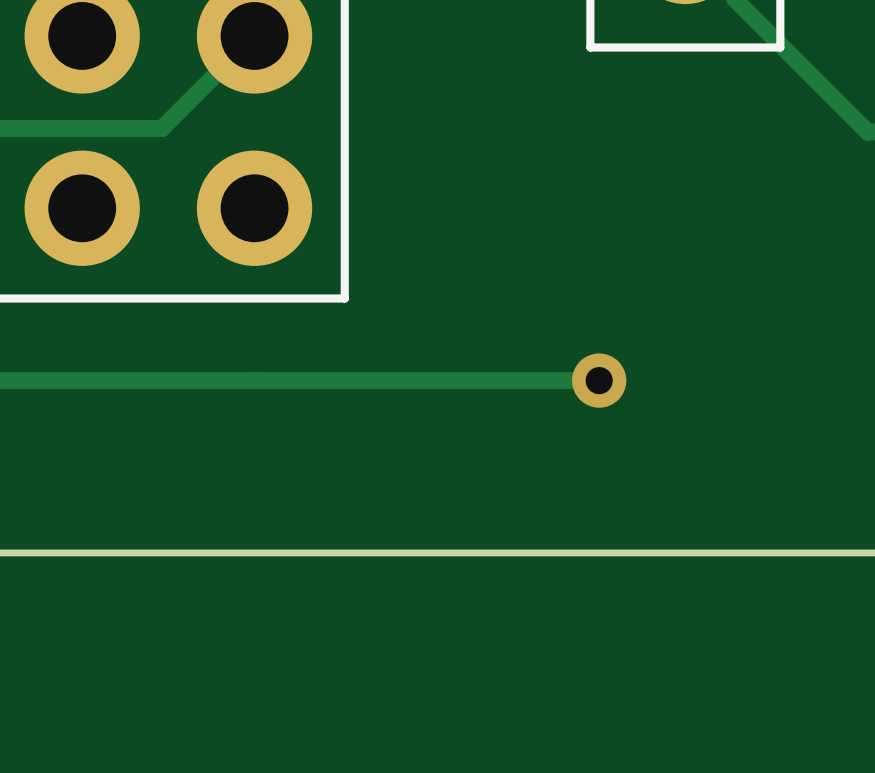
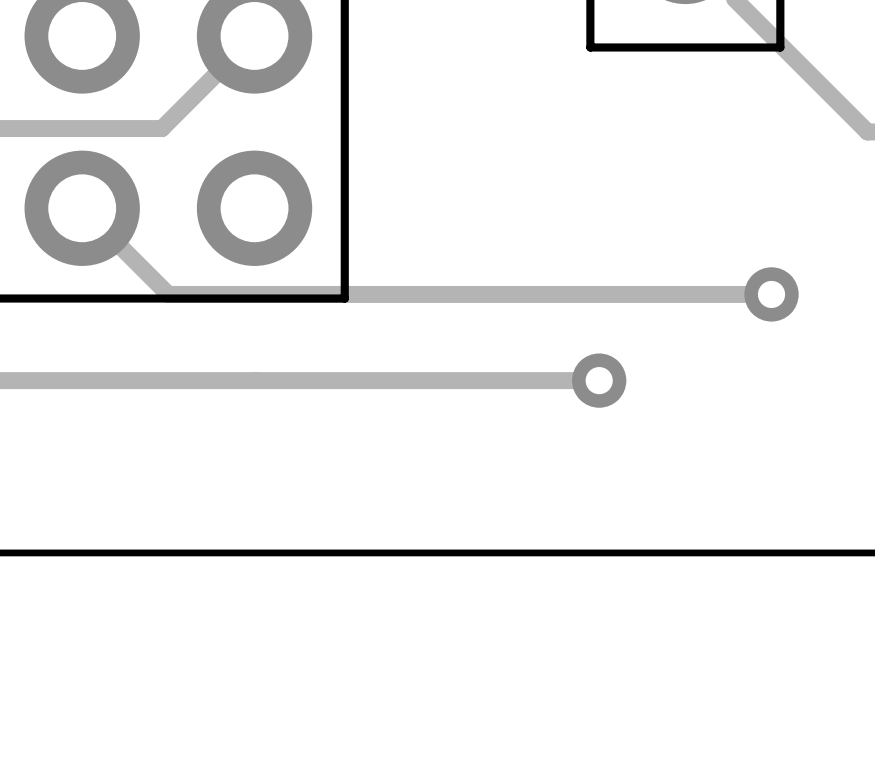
track: none -> (82, 208) (168, 294) (771, 294)
via: none -> (771, 294)

